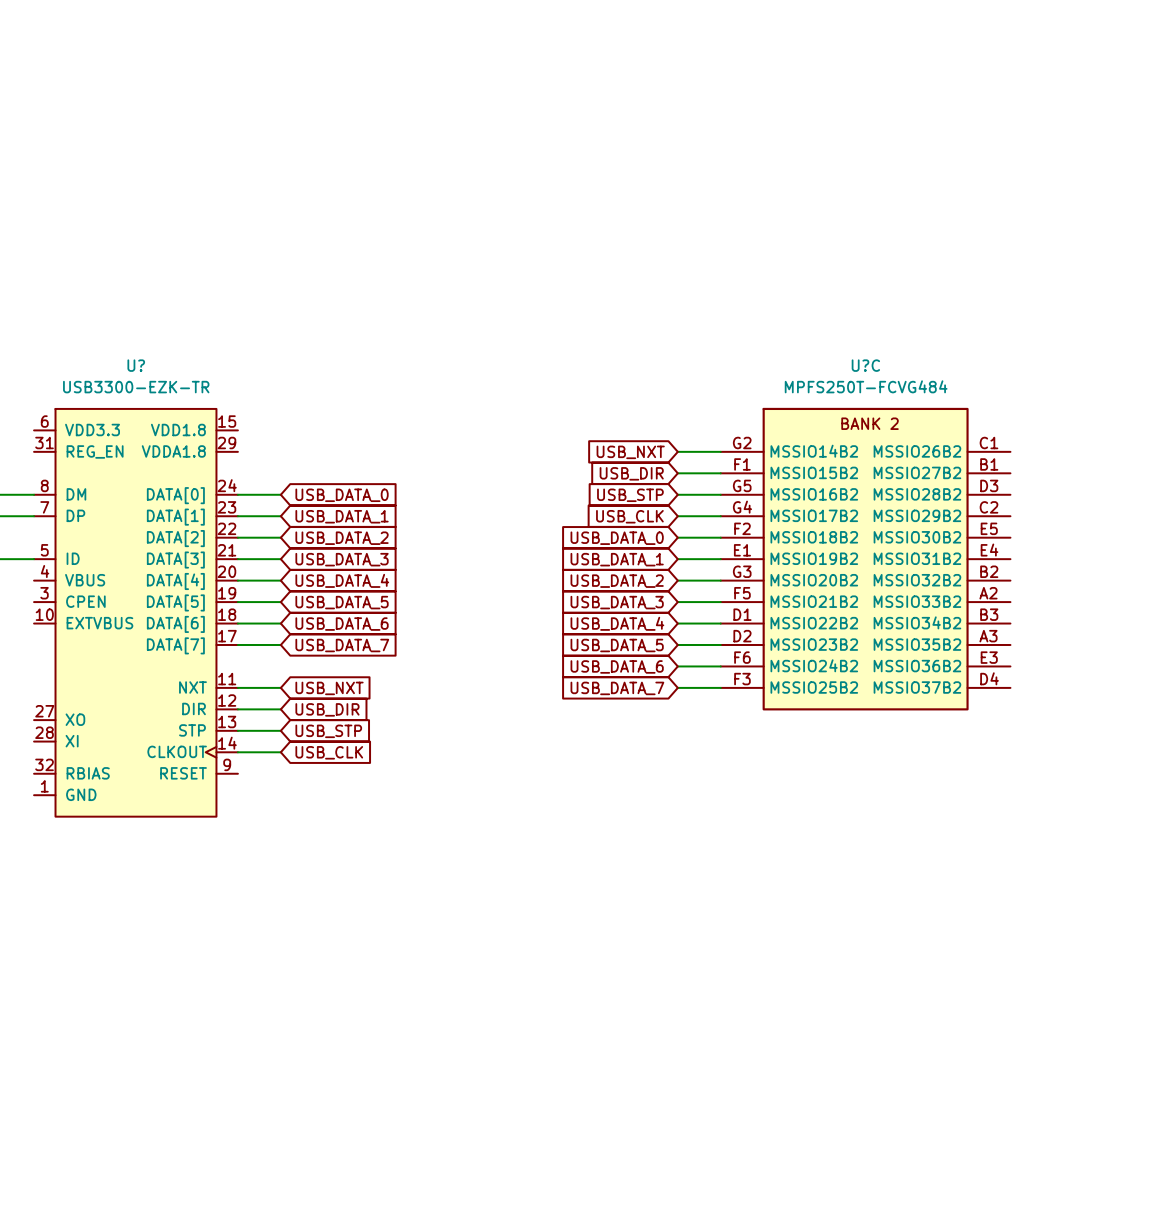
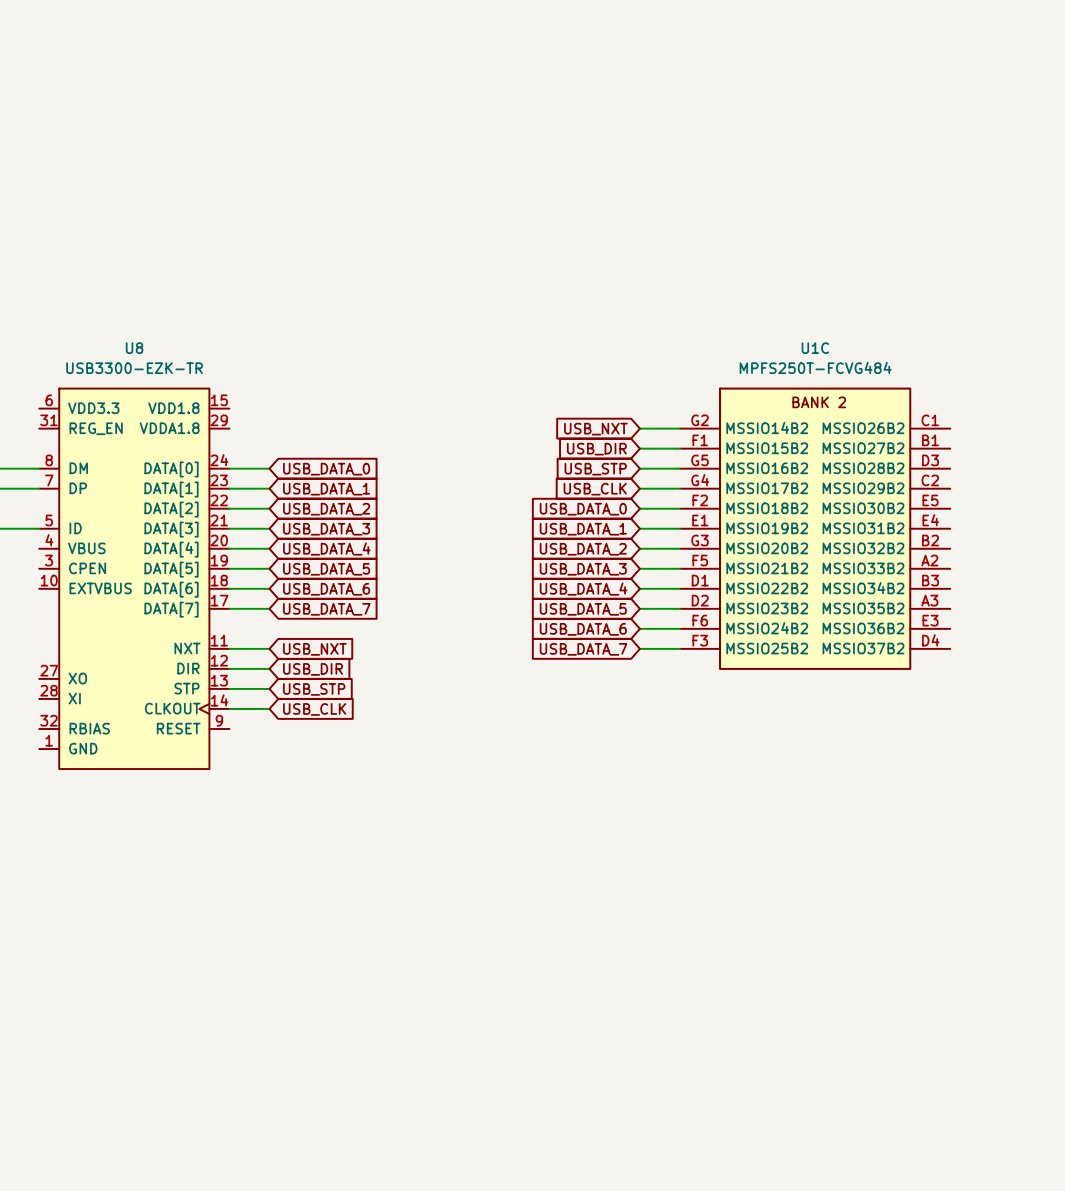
U? name: U? (136, 365) -> U8 (134, 348)
U?C name: U?C (865, 365) -> U1C (815, 348)

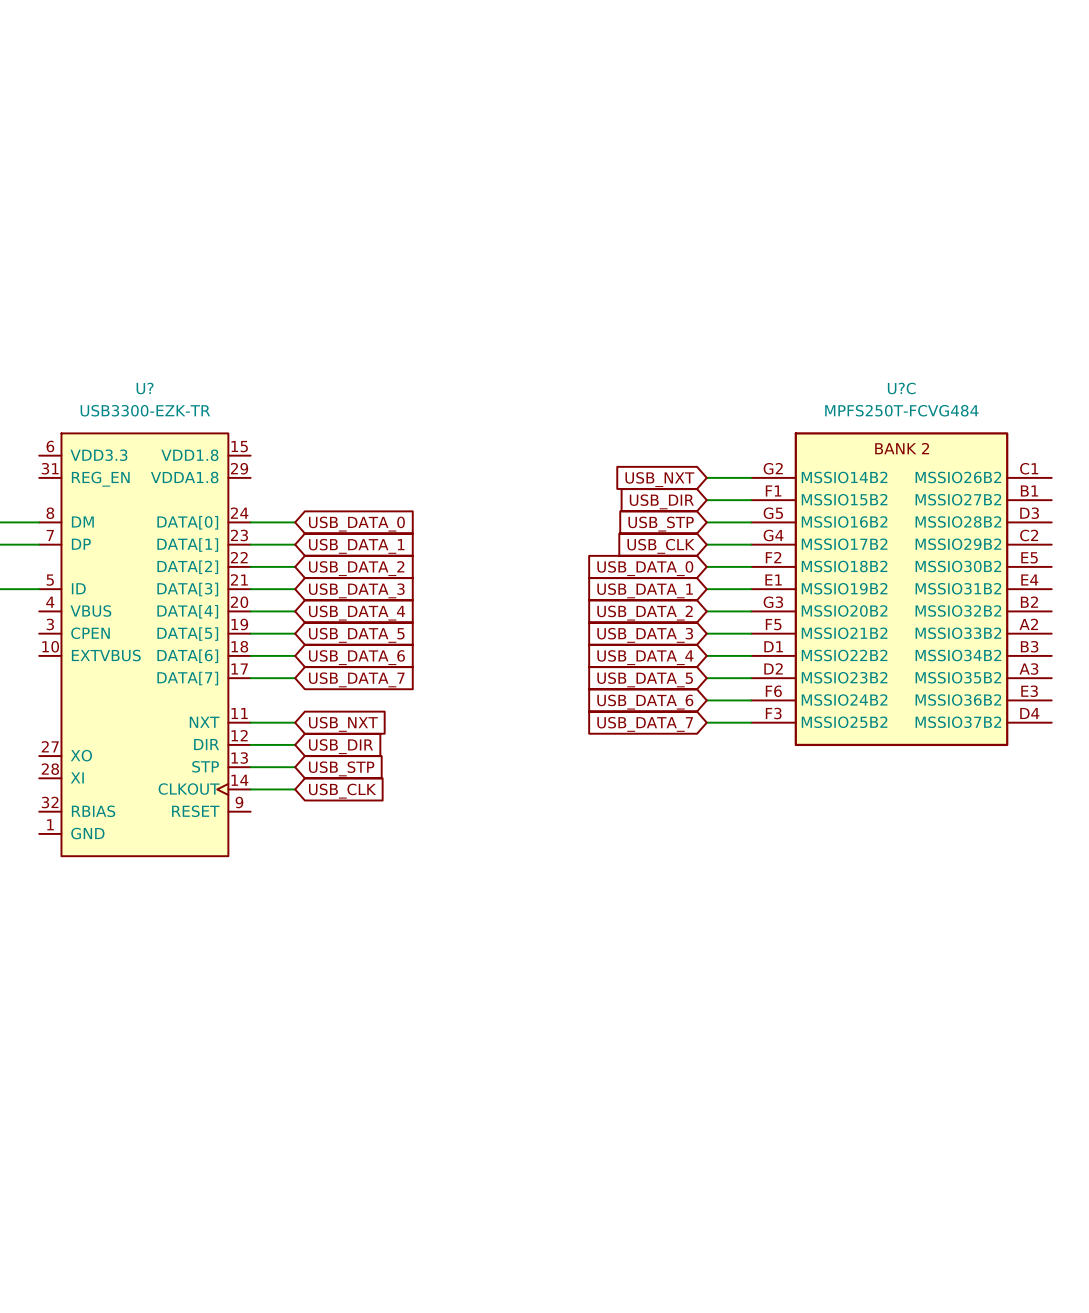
U8 name: U8 (134, 348) -> U? (145, 388)
U1C name: U1C (815, 348) -> U?C (901, 388)

